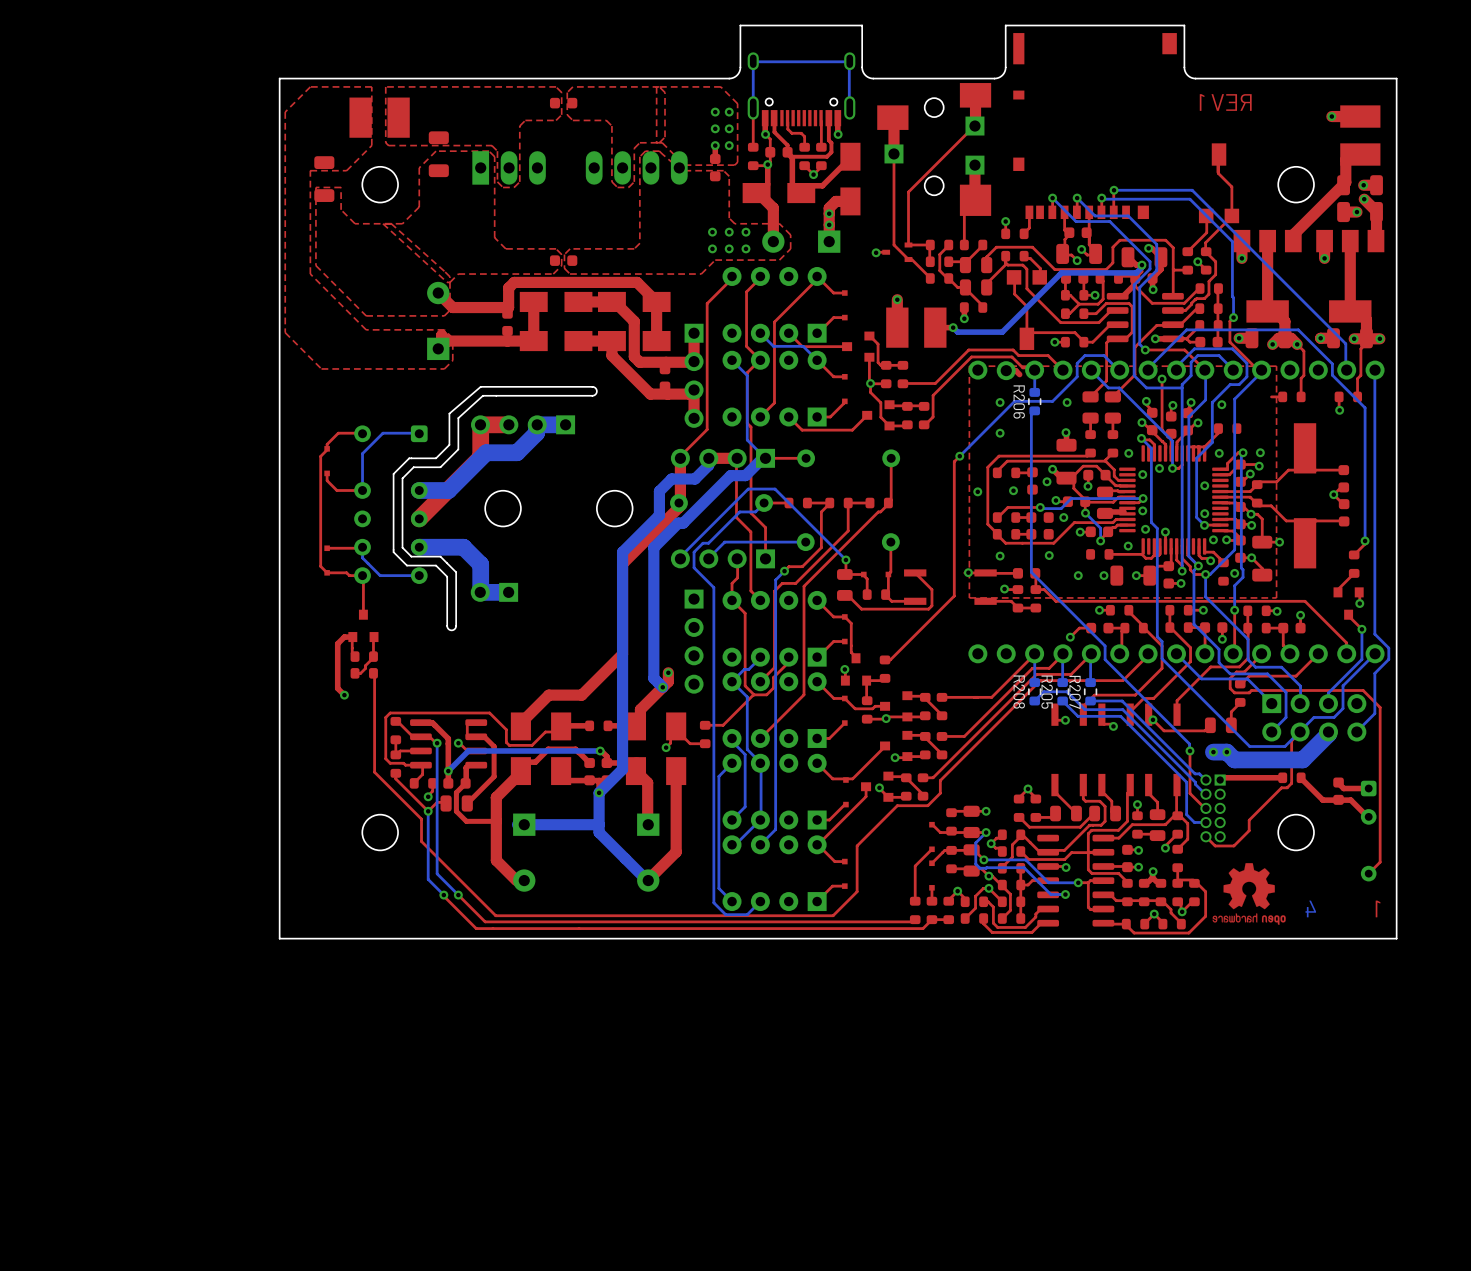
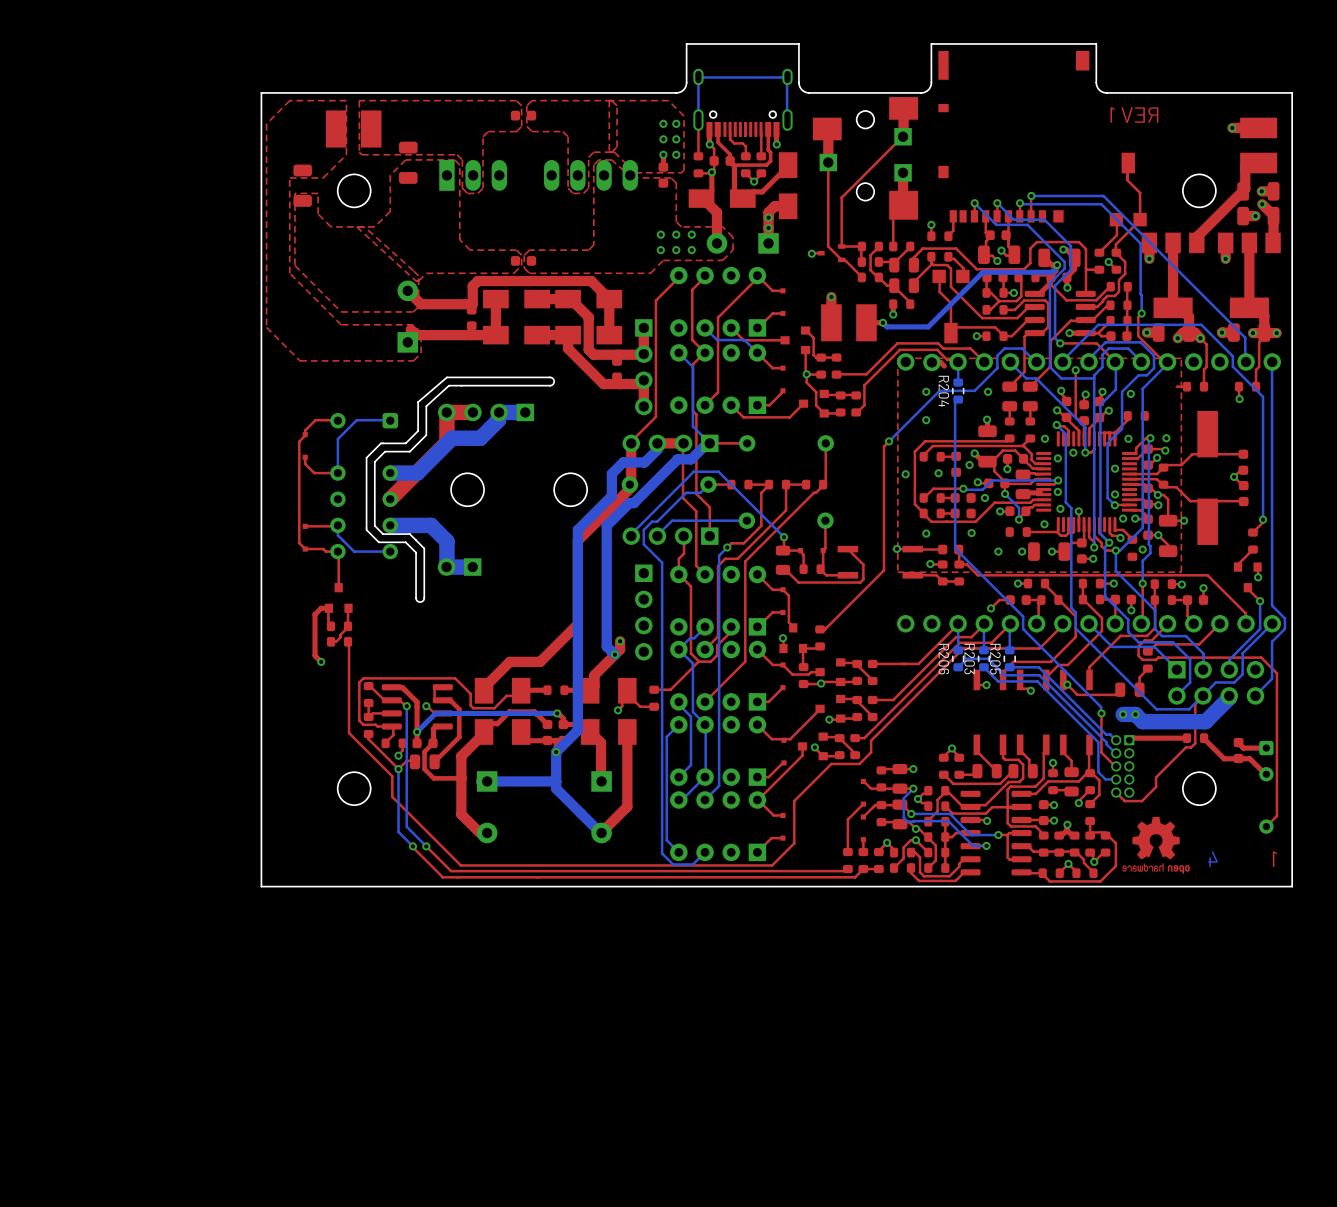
R206 name: R206 (1019, 401) -> R204 (943, 391)
R208 name: R208 (1019, 692) -> R206 (943, 659)
R205 name: R205 (1047, 692) -> R203 (969, 659)
R207 name: R207 (1075, 692) -> R205 (995, 659)

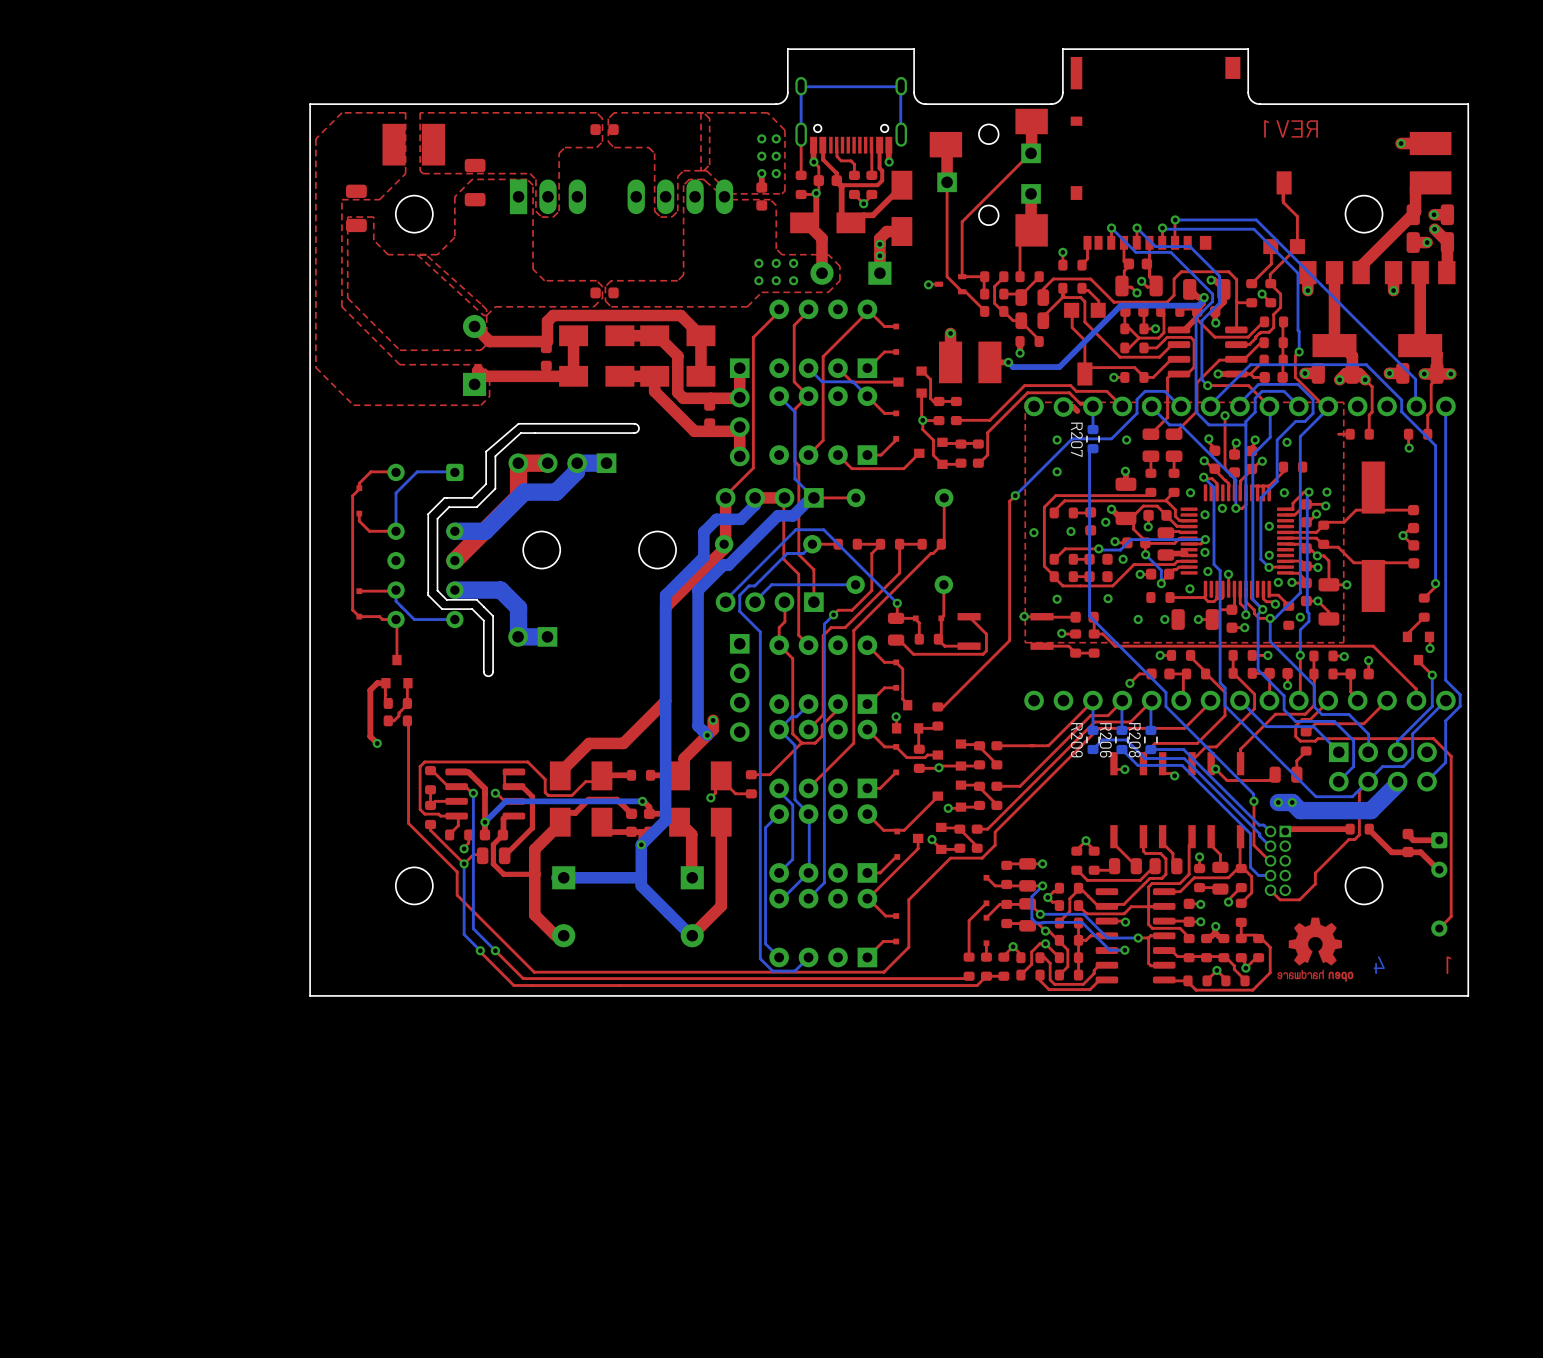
R204 name: R204 (943, 391) -> R207 (1076, 439)
R206 name: R206 (943, 659) -> R209 (1076, 740)
R203 name: R203 (969, 659) -> R206 (1105, 740)
R205 name: R205 (995, 659) -> R208 (1134, 740)

